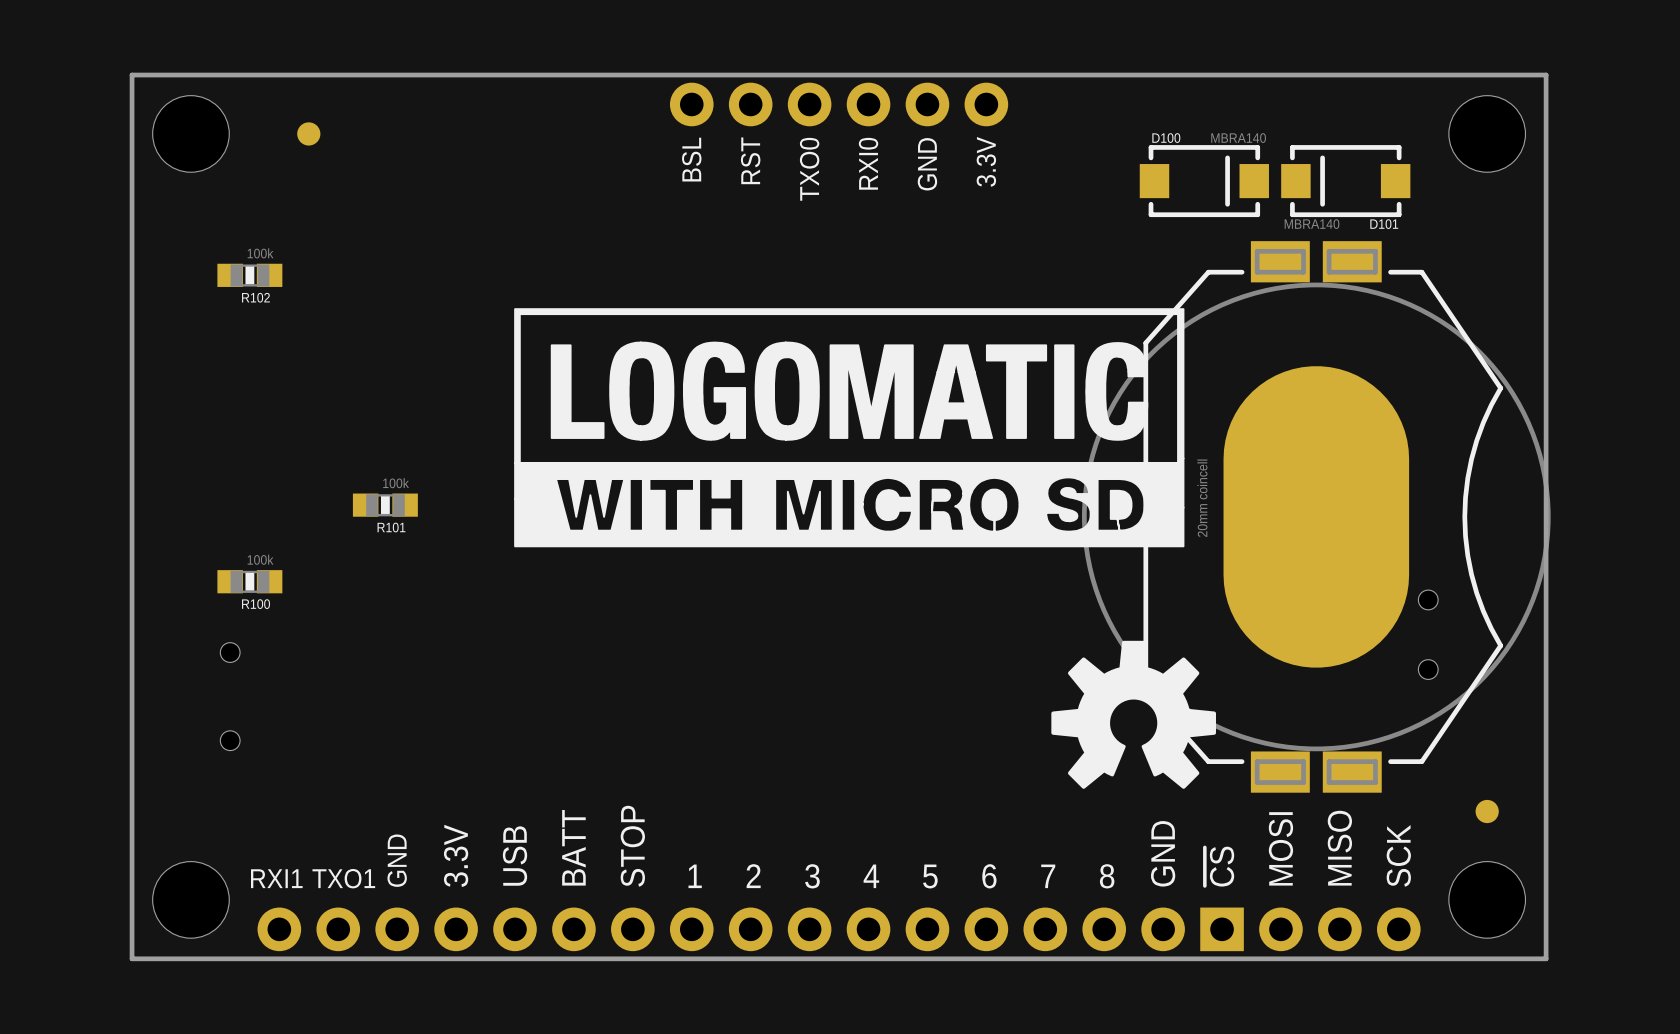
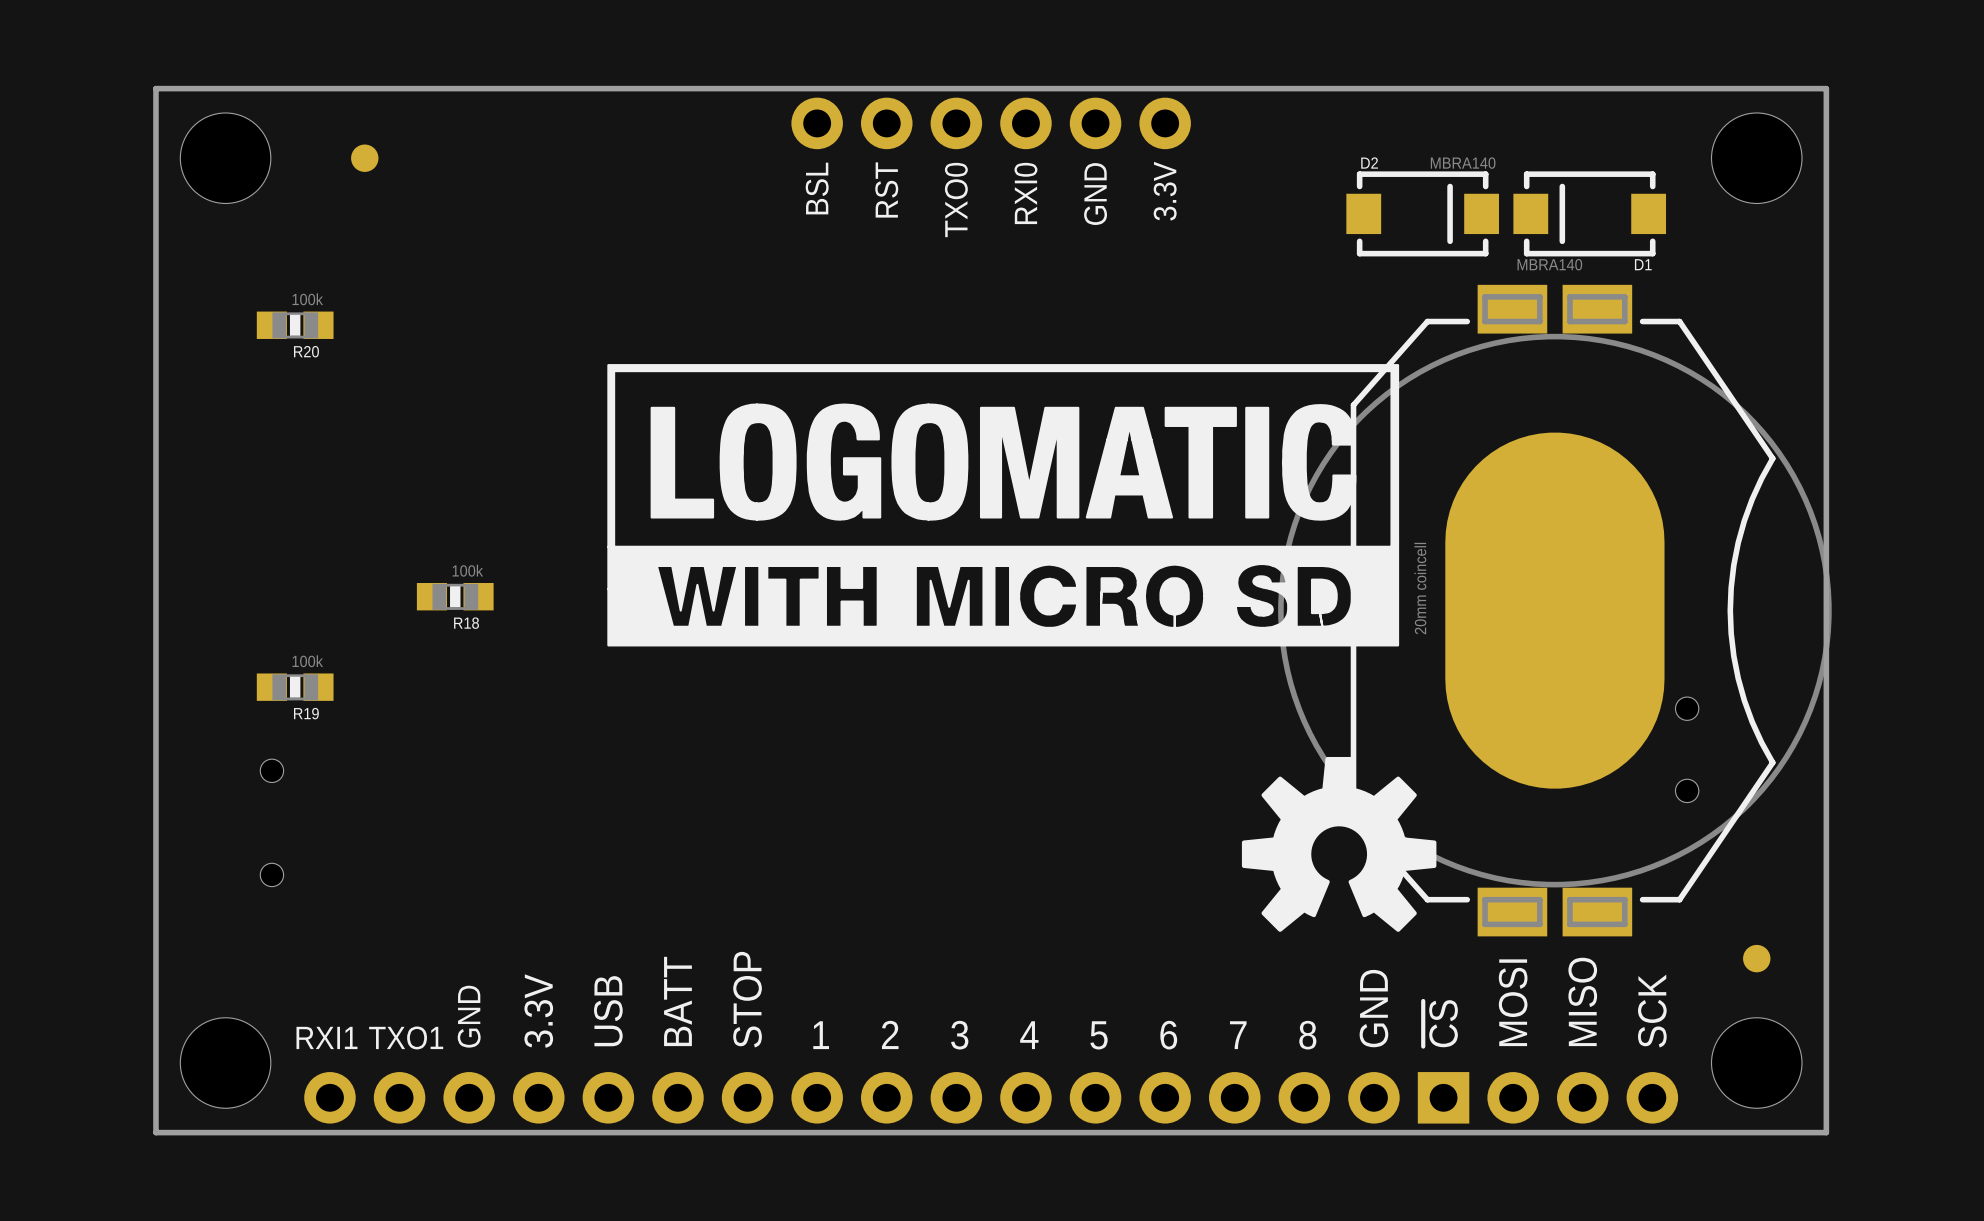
D100 name: D100 (1166, 138) -> D2 (1369, 163)
D101 name: D101 (1384, 224) -> D1 (1643, 264)
R102 name: R102 (255, 297) -> R20 (306, 351)
R101 name: R101 (391, 527) -> R18 (466, 623)
R100 name: R100 (256, 604) -> R19 (306, 713)

